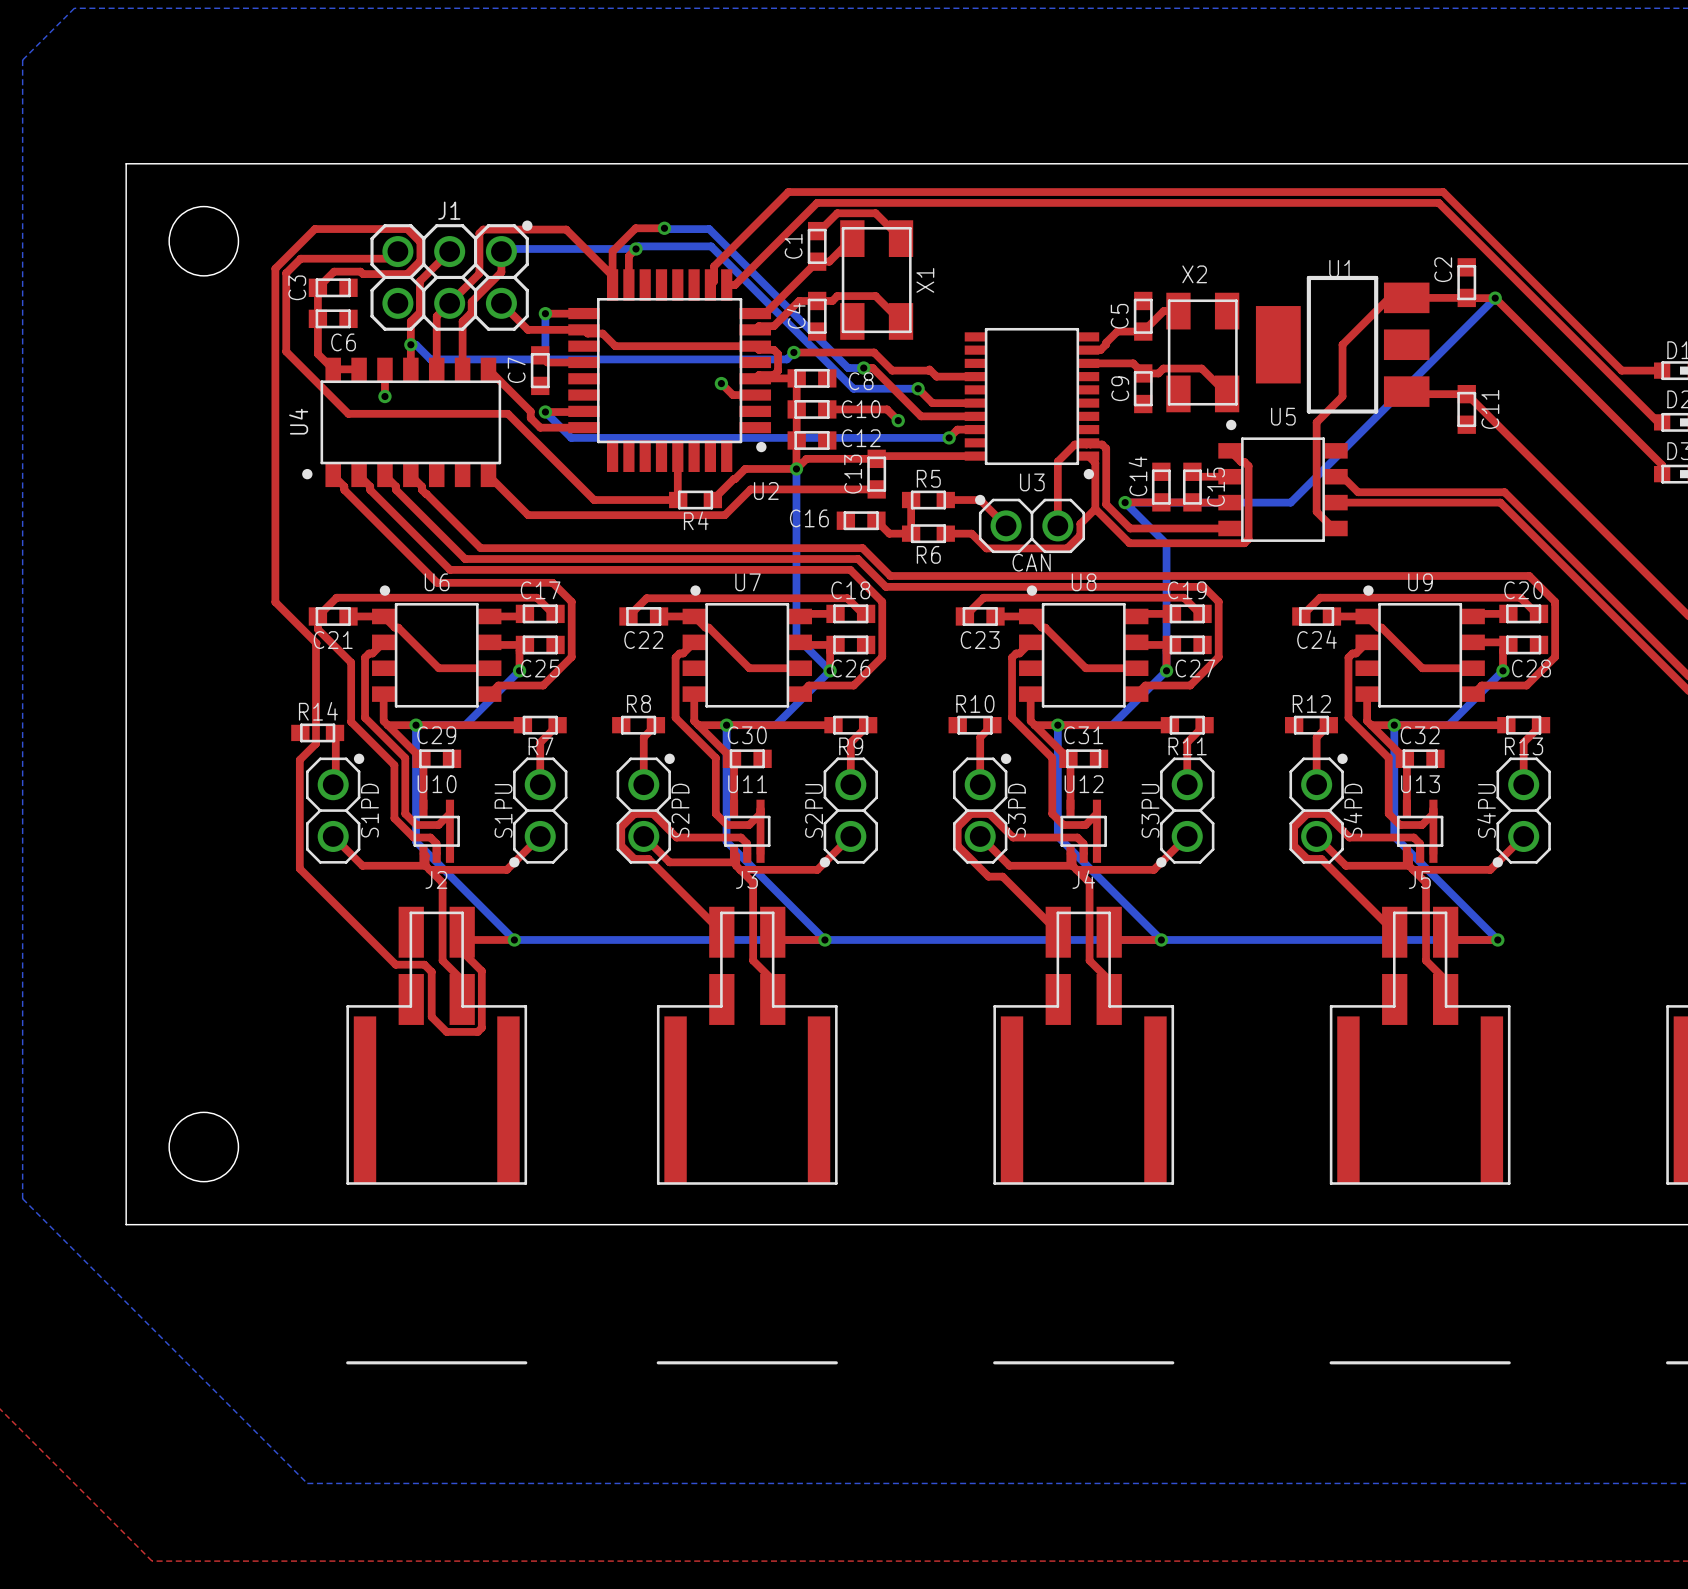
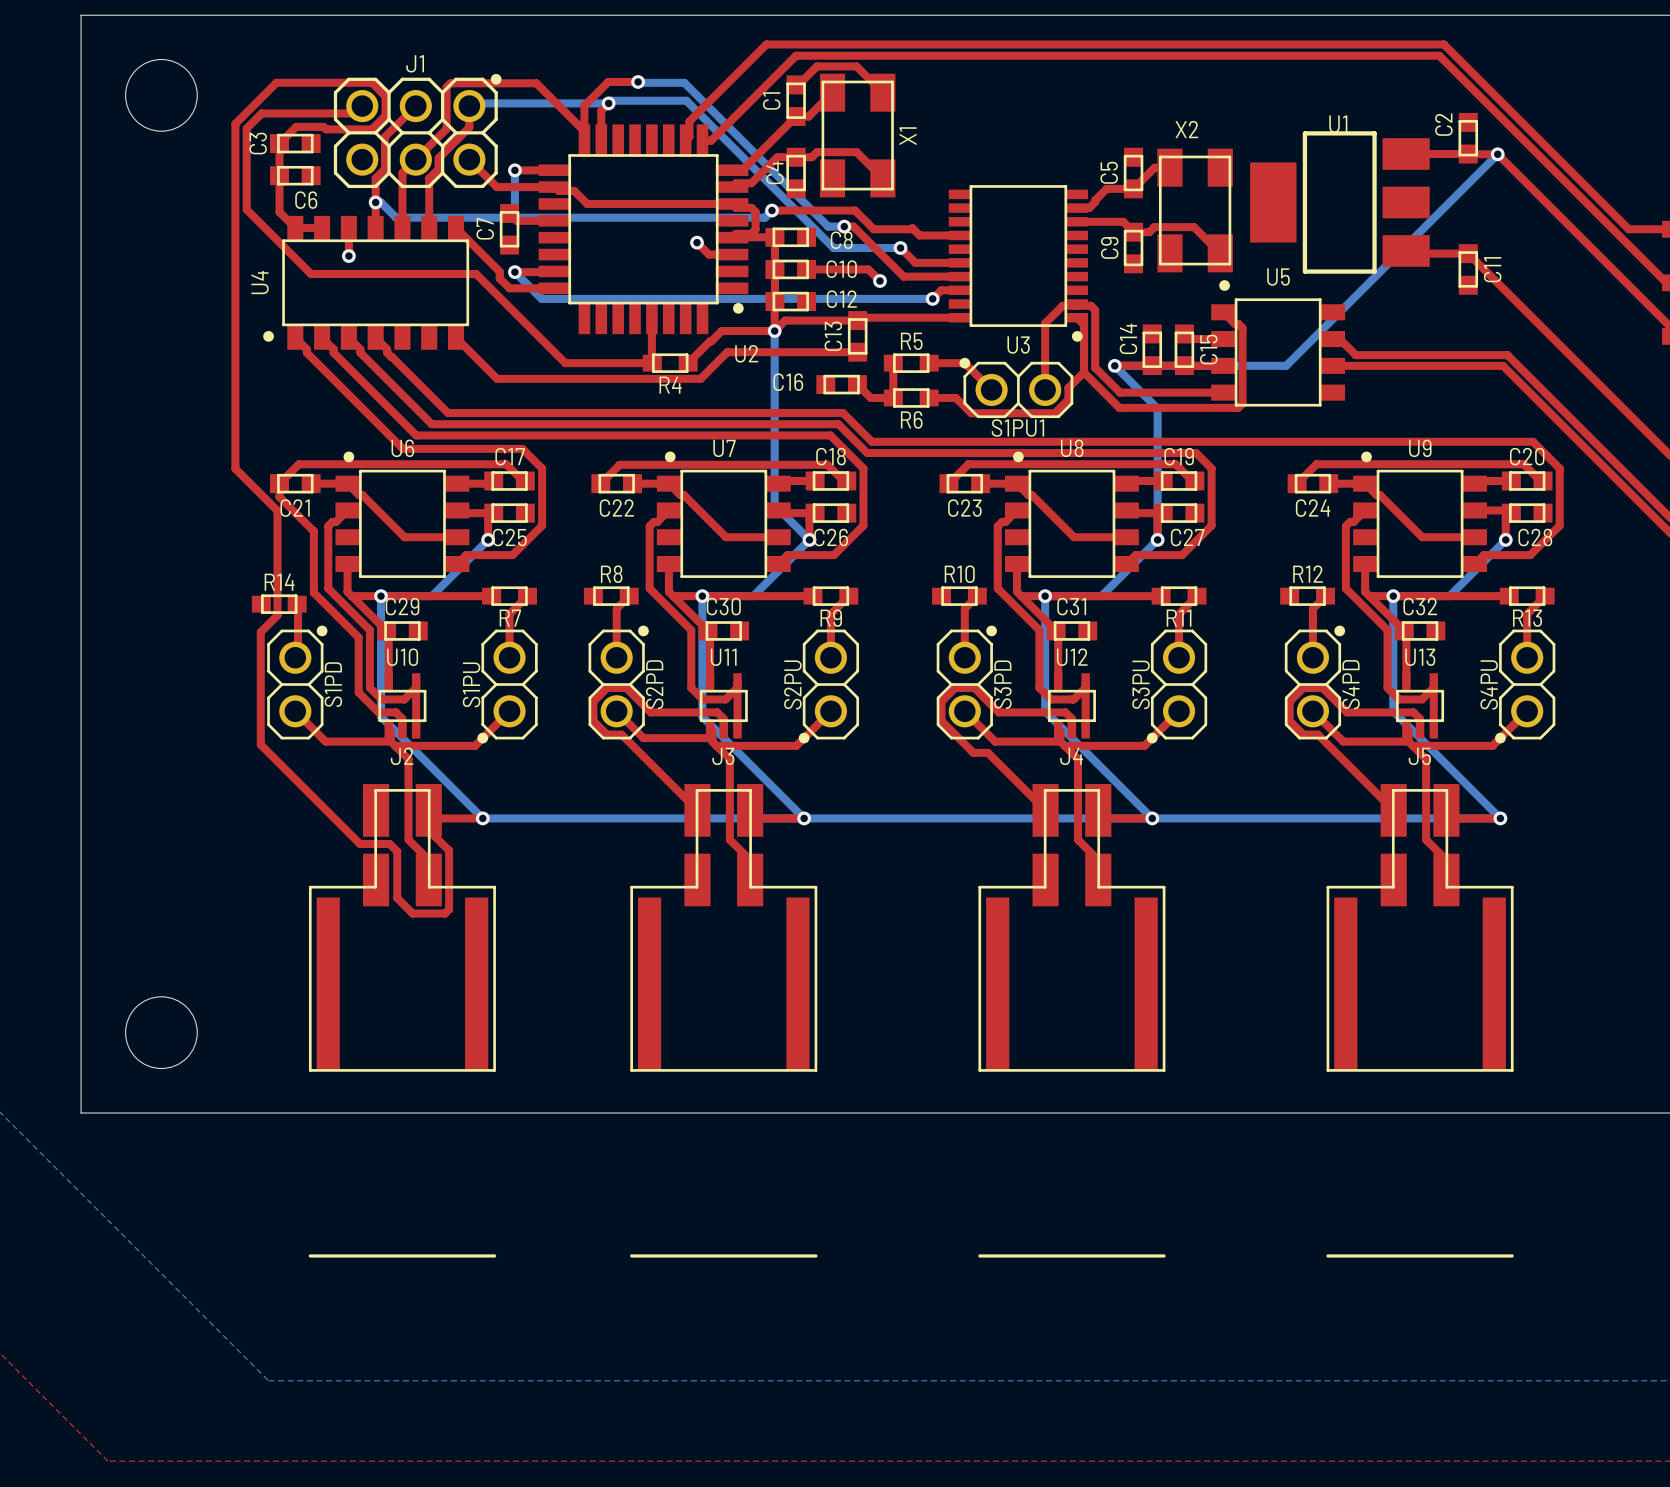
top track: (1406, 297) (1389, 297) (1342, 344) (1342, 396) (1316, 422) (1316, 511) (1333, 528) (1336, 528) -> none
CAN name: CAN (1031, 562) -> S1PU1 (1017, 427)

